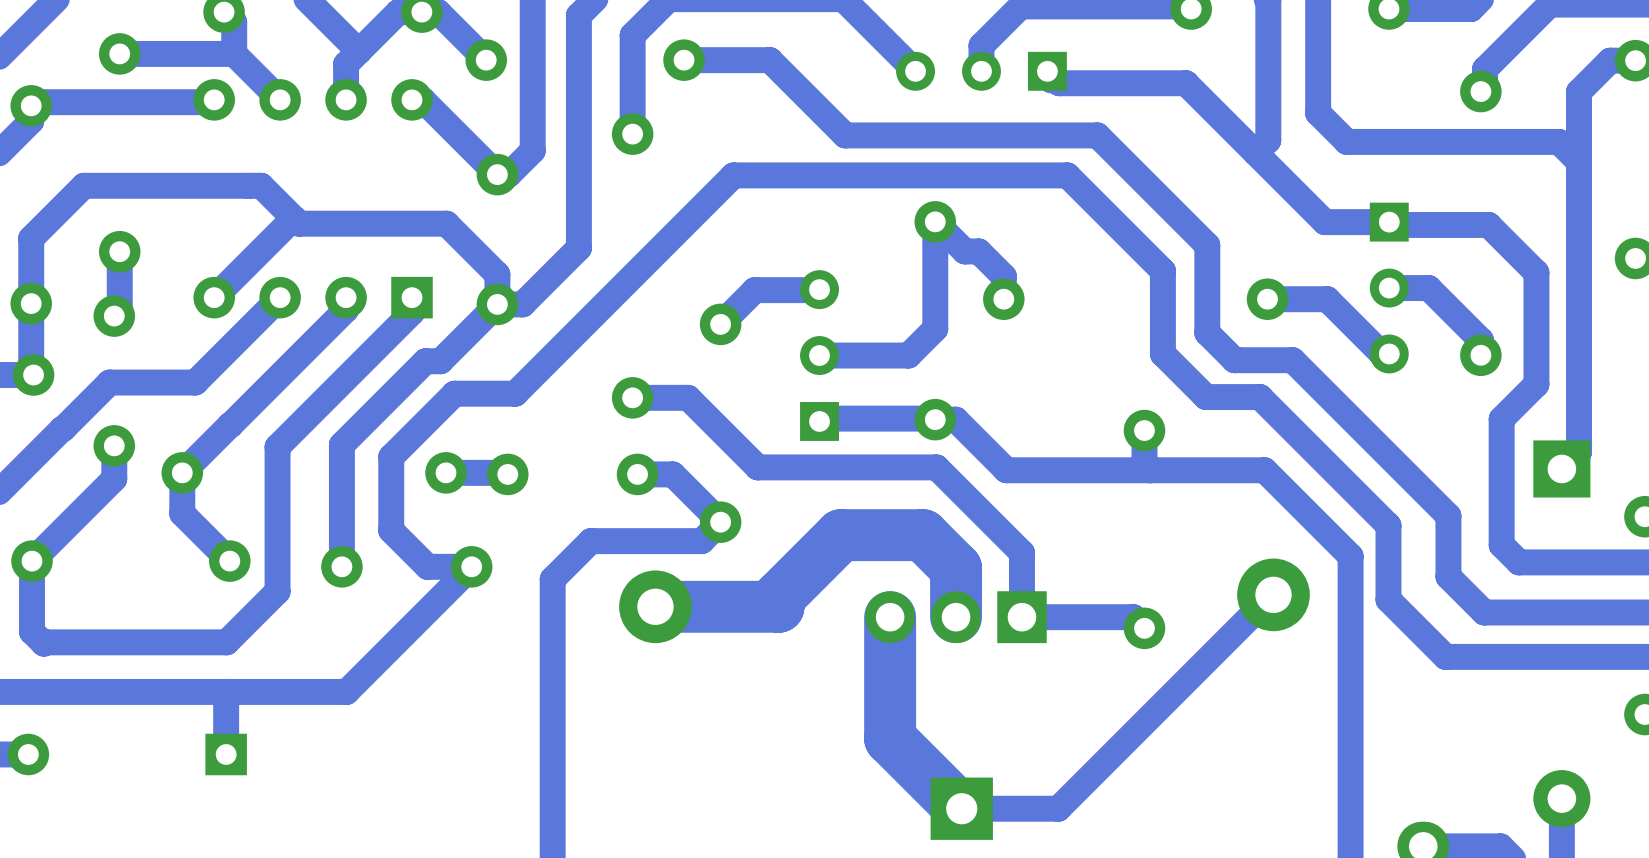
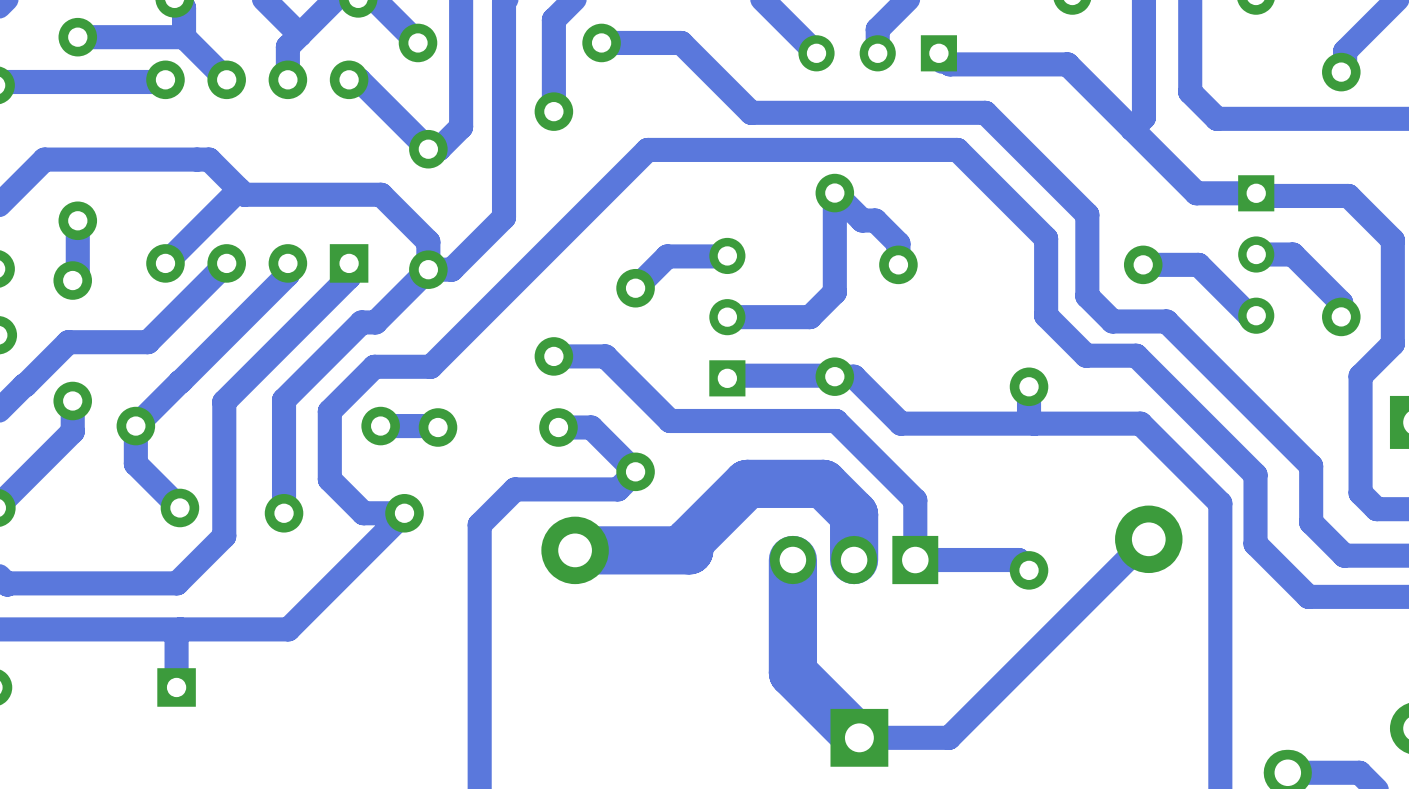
track: (515, 393) (454, 393) (439, 409) -> (444, 352) (430, 366) (374, 366)

